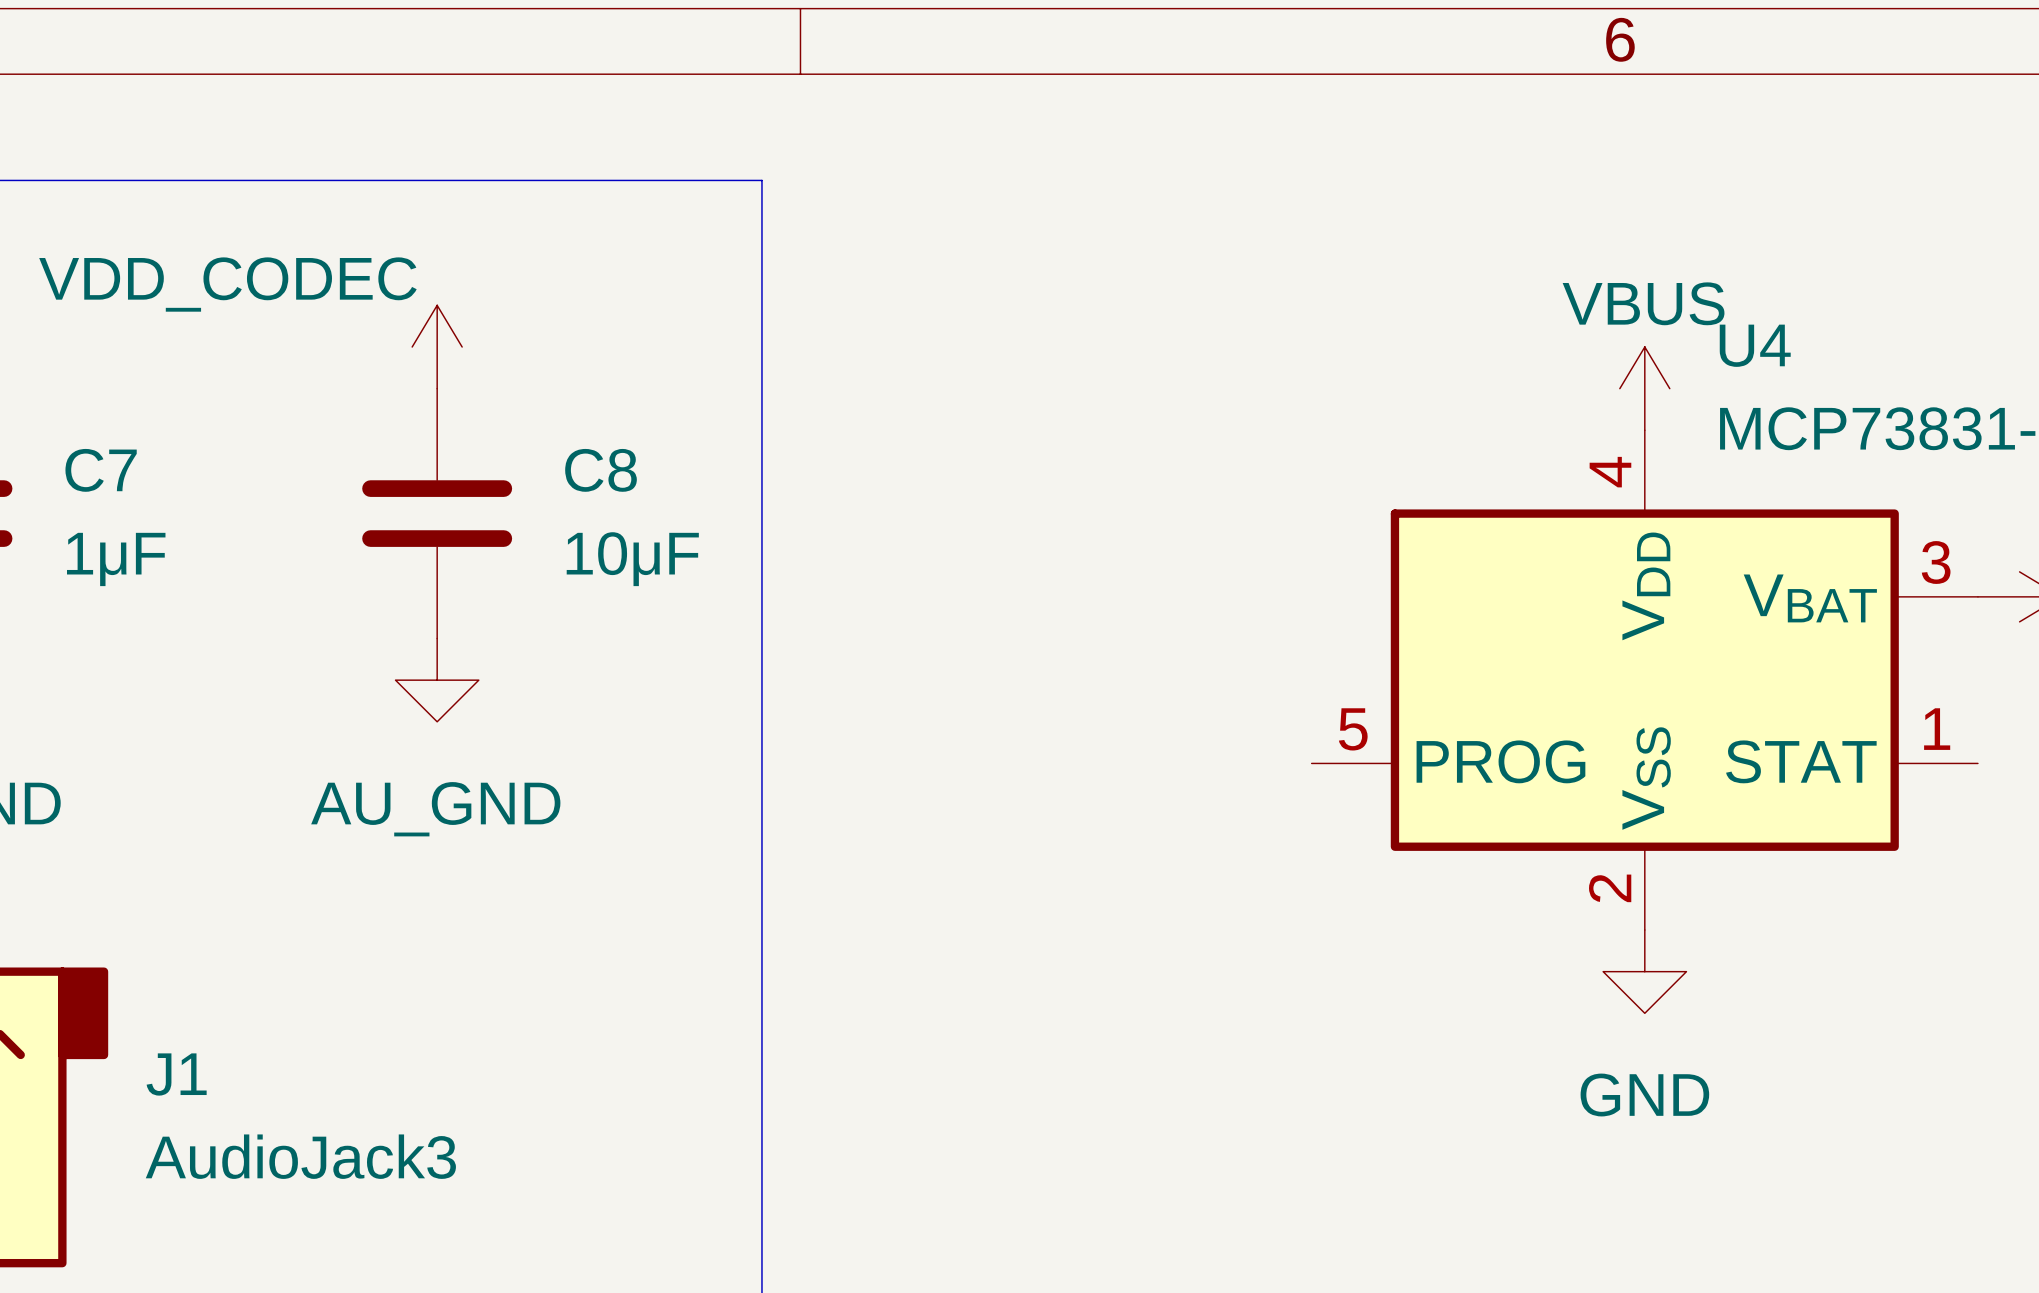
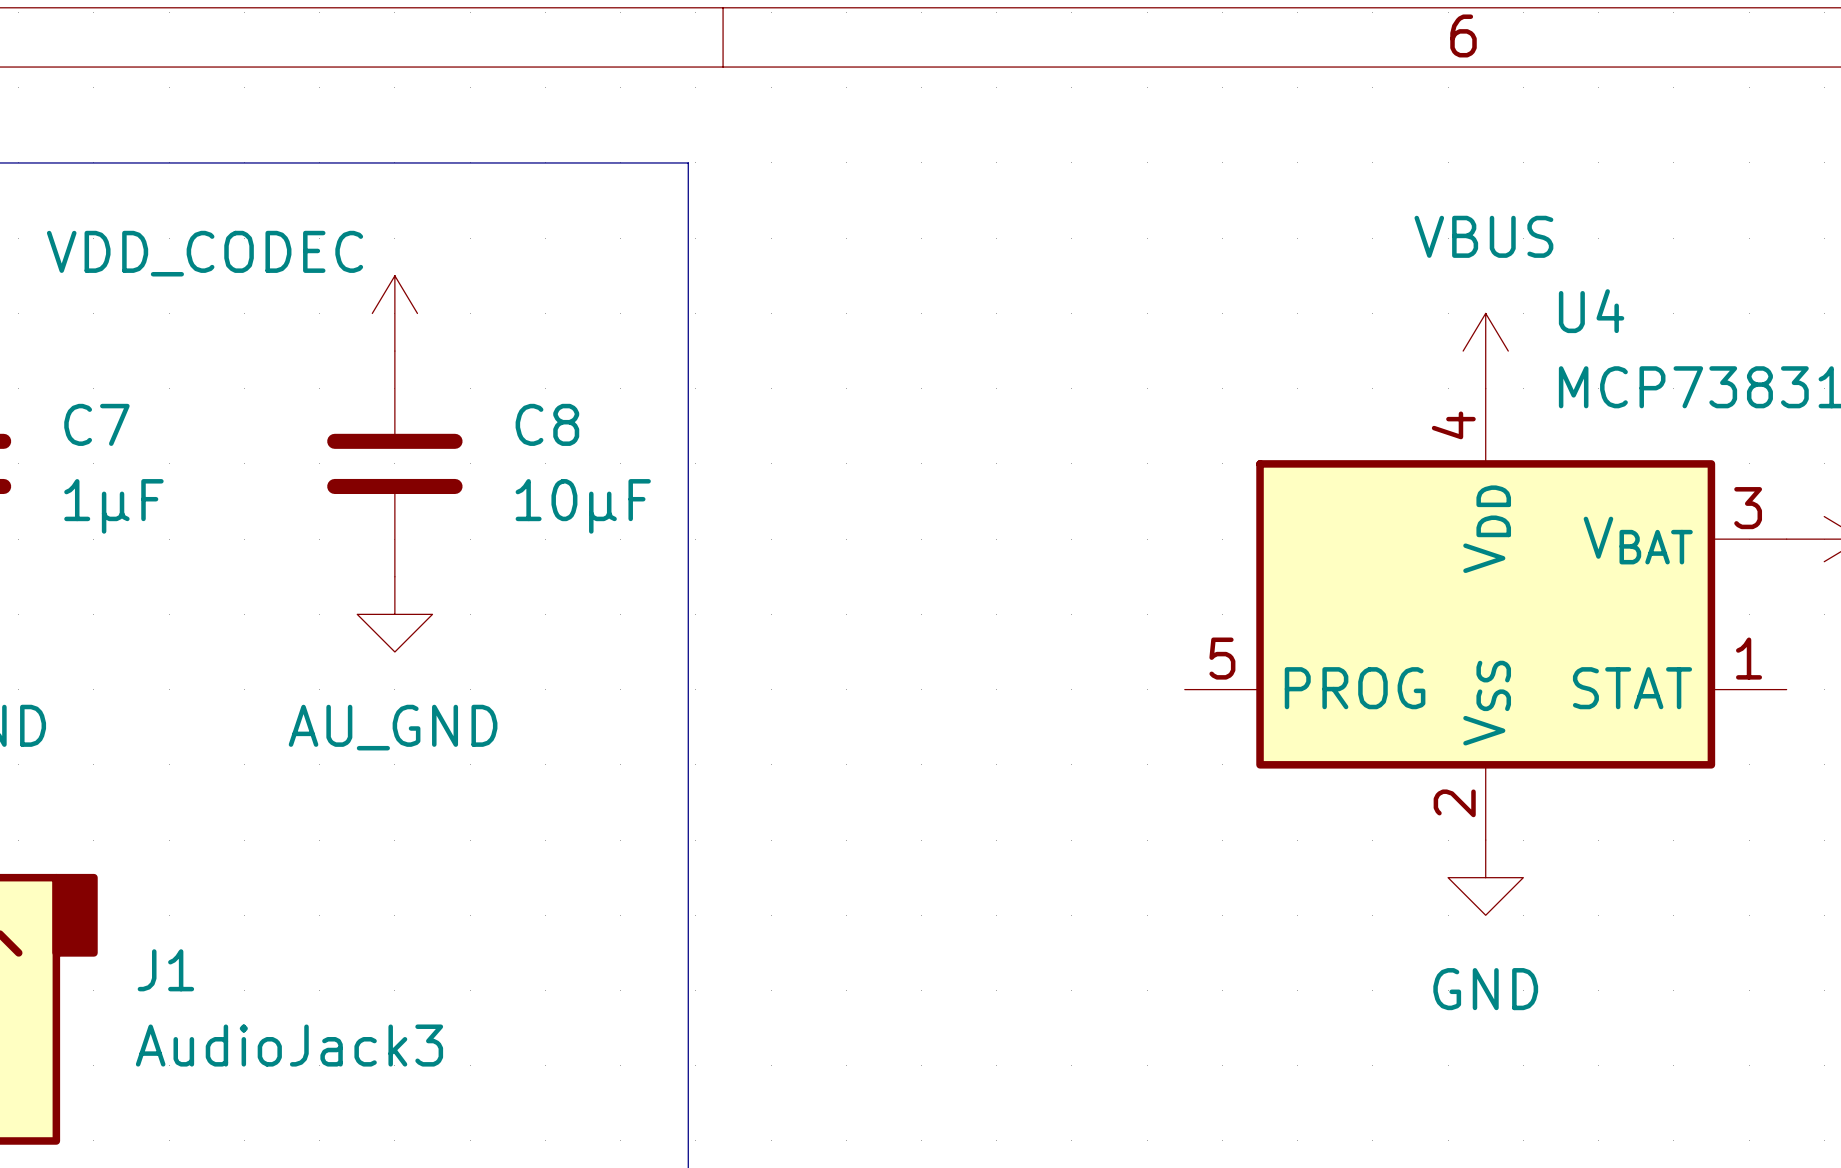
power symbol text position: VBUS (1643, 303) -> VBUS (1483, 236)

